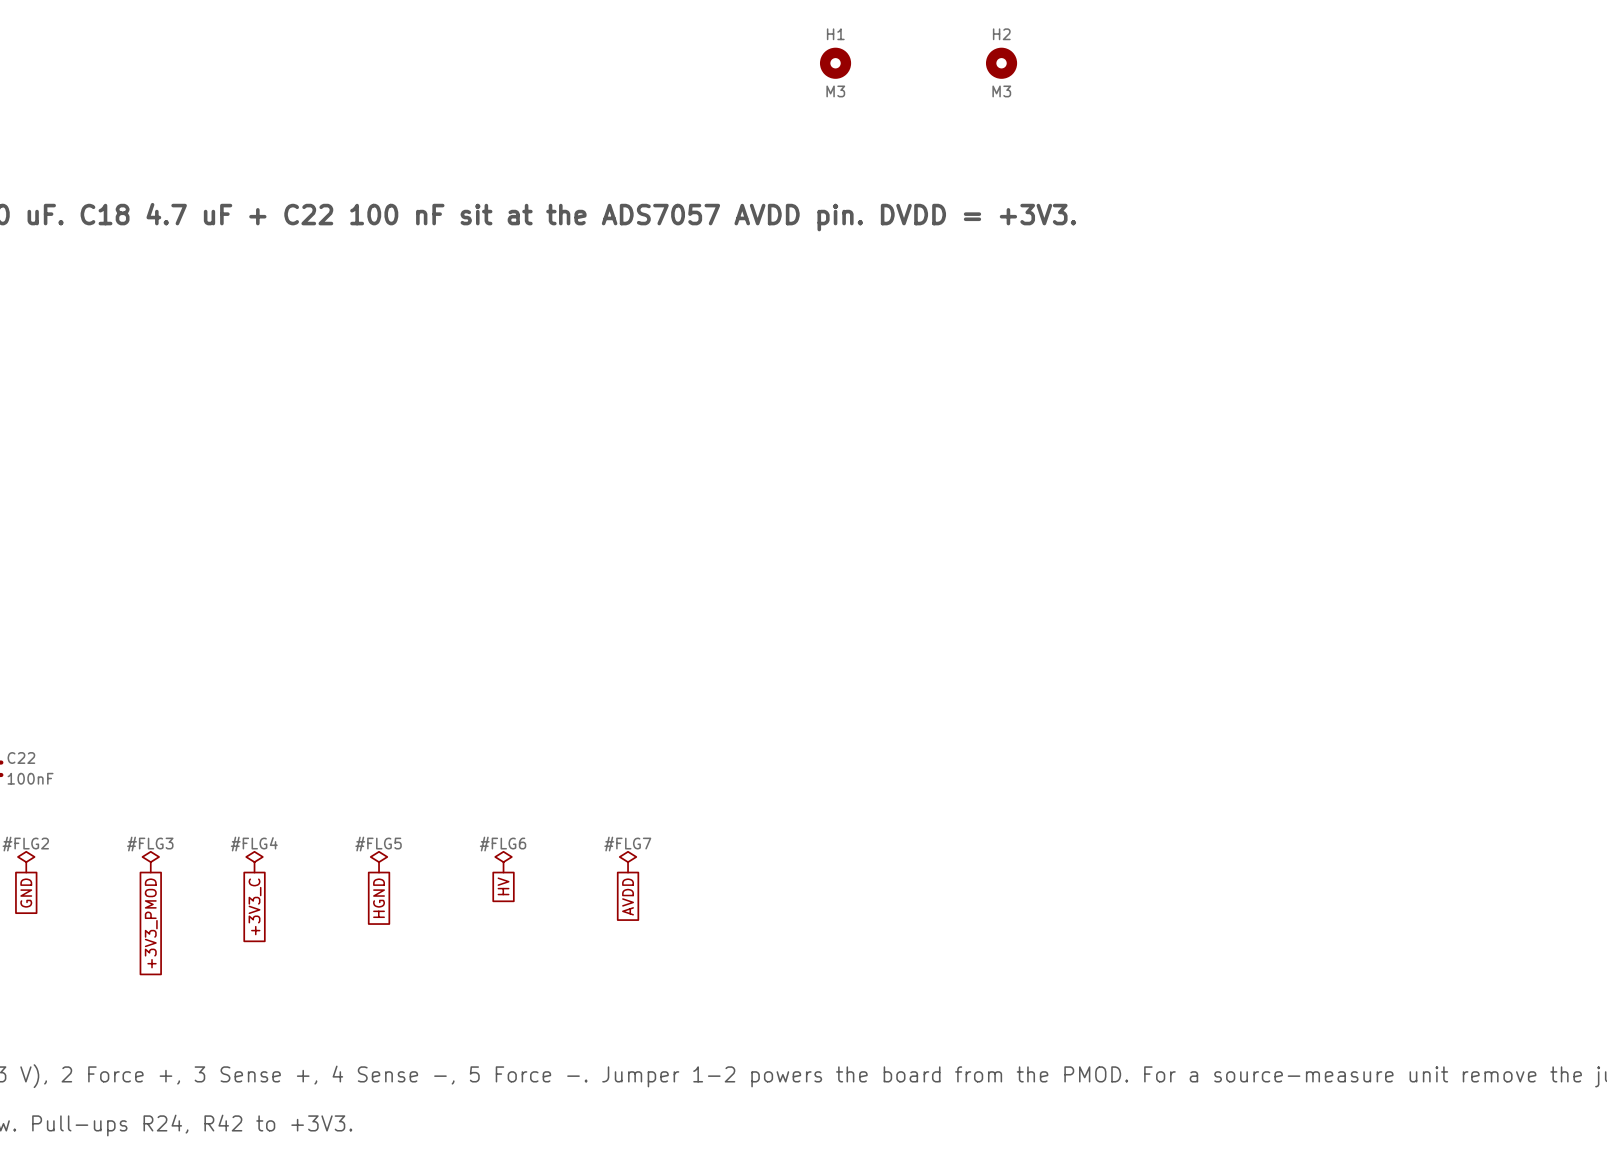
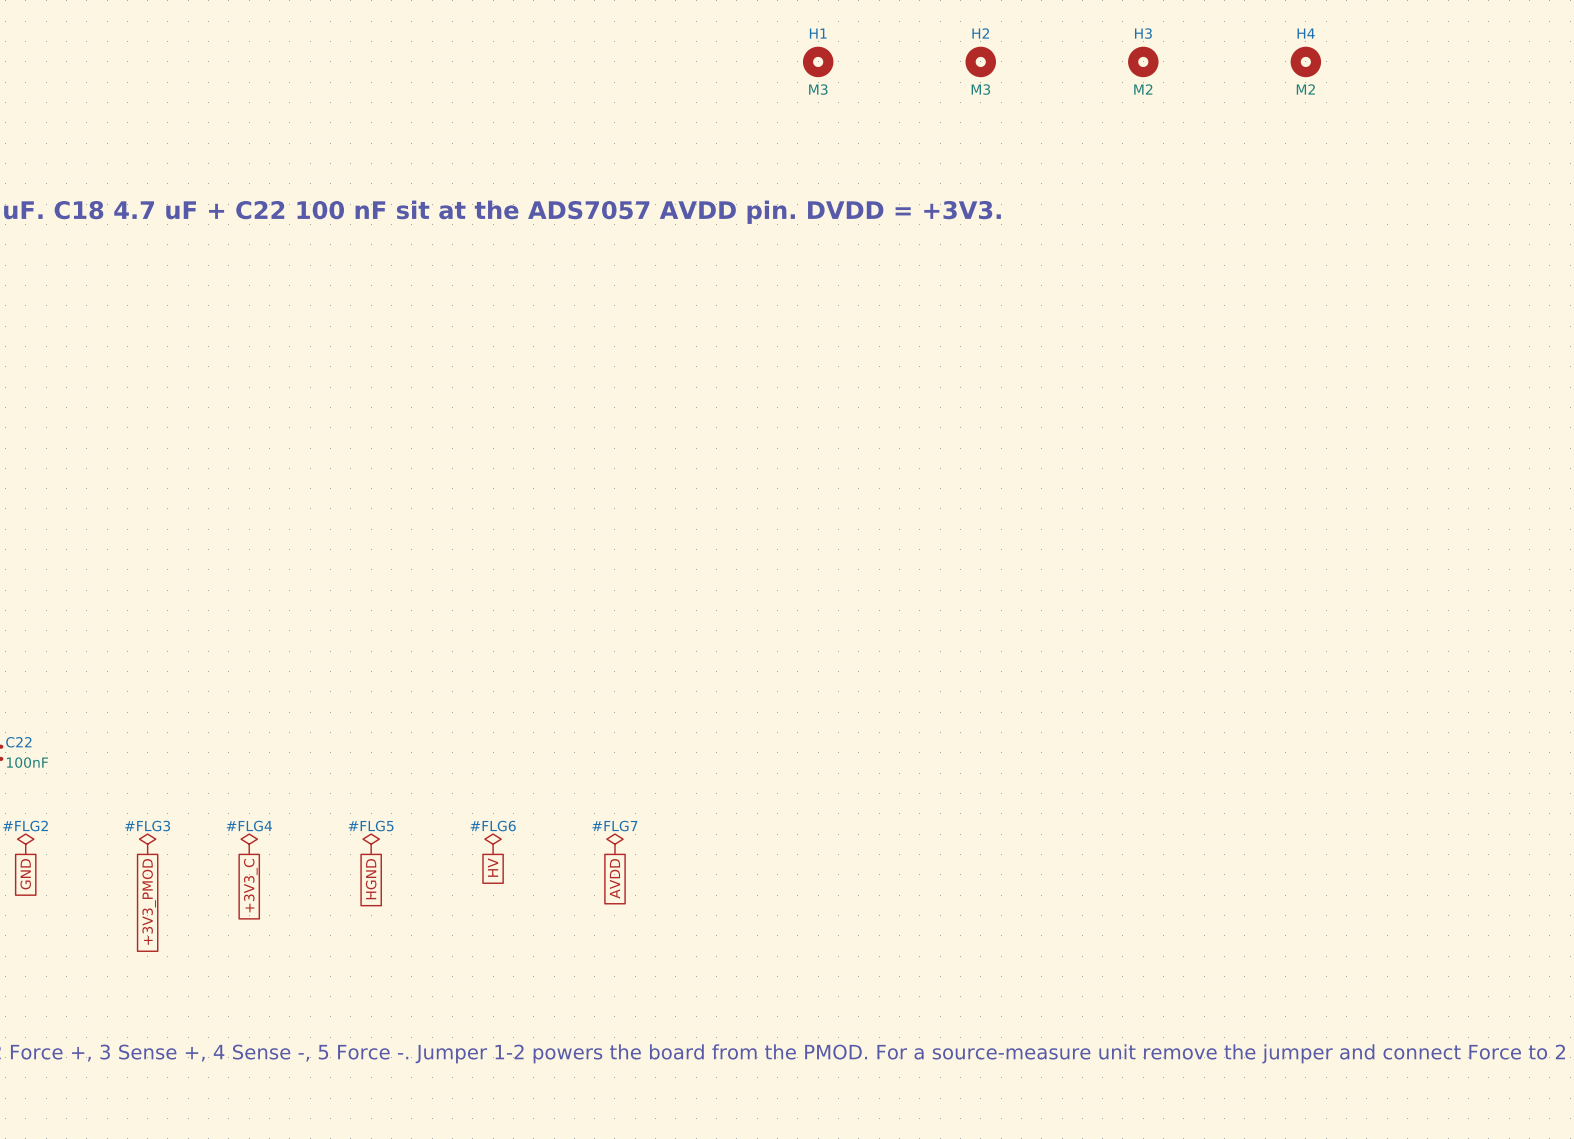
H3: none -> M2 (1143, 61)
H4: none -> M2 (1305, 61)

